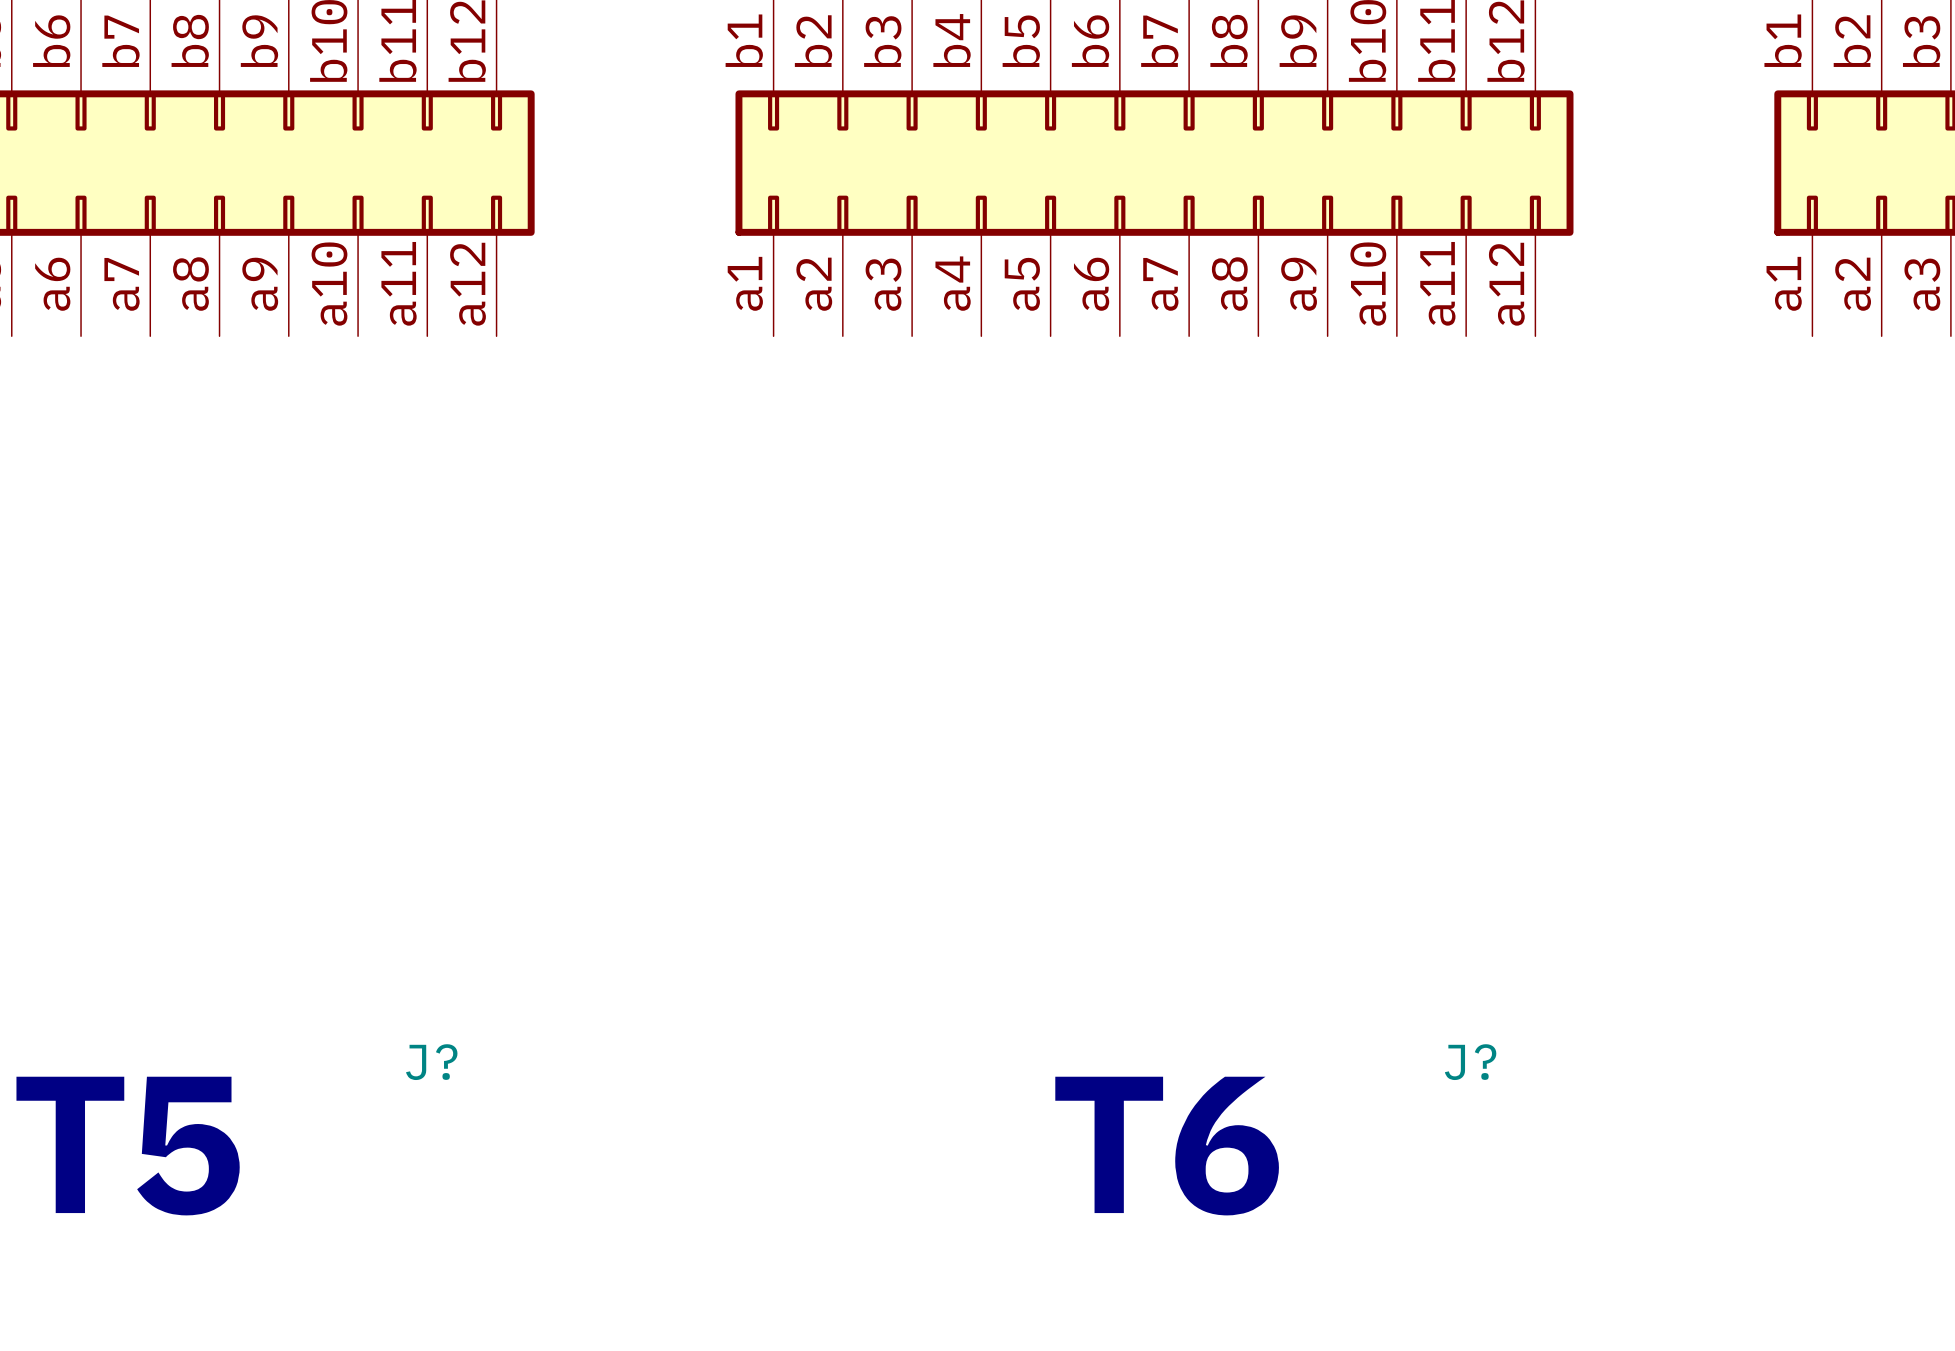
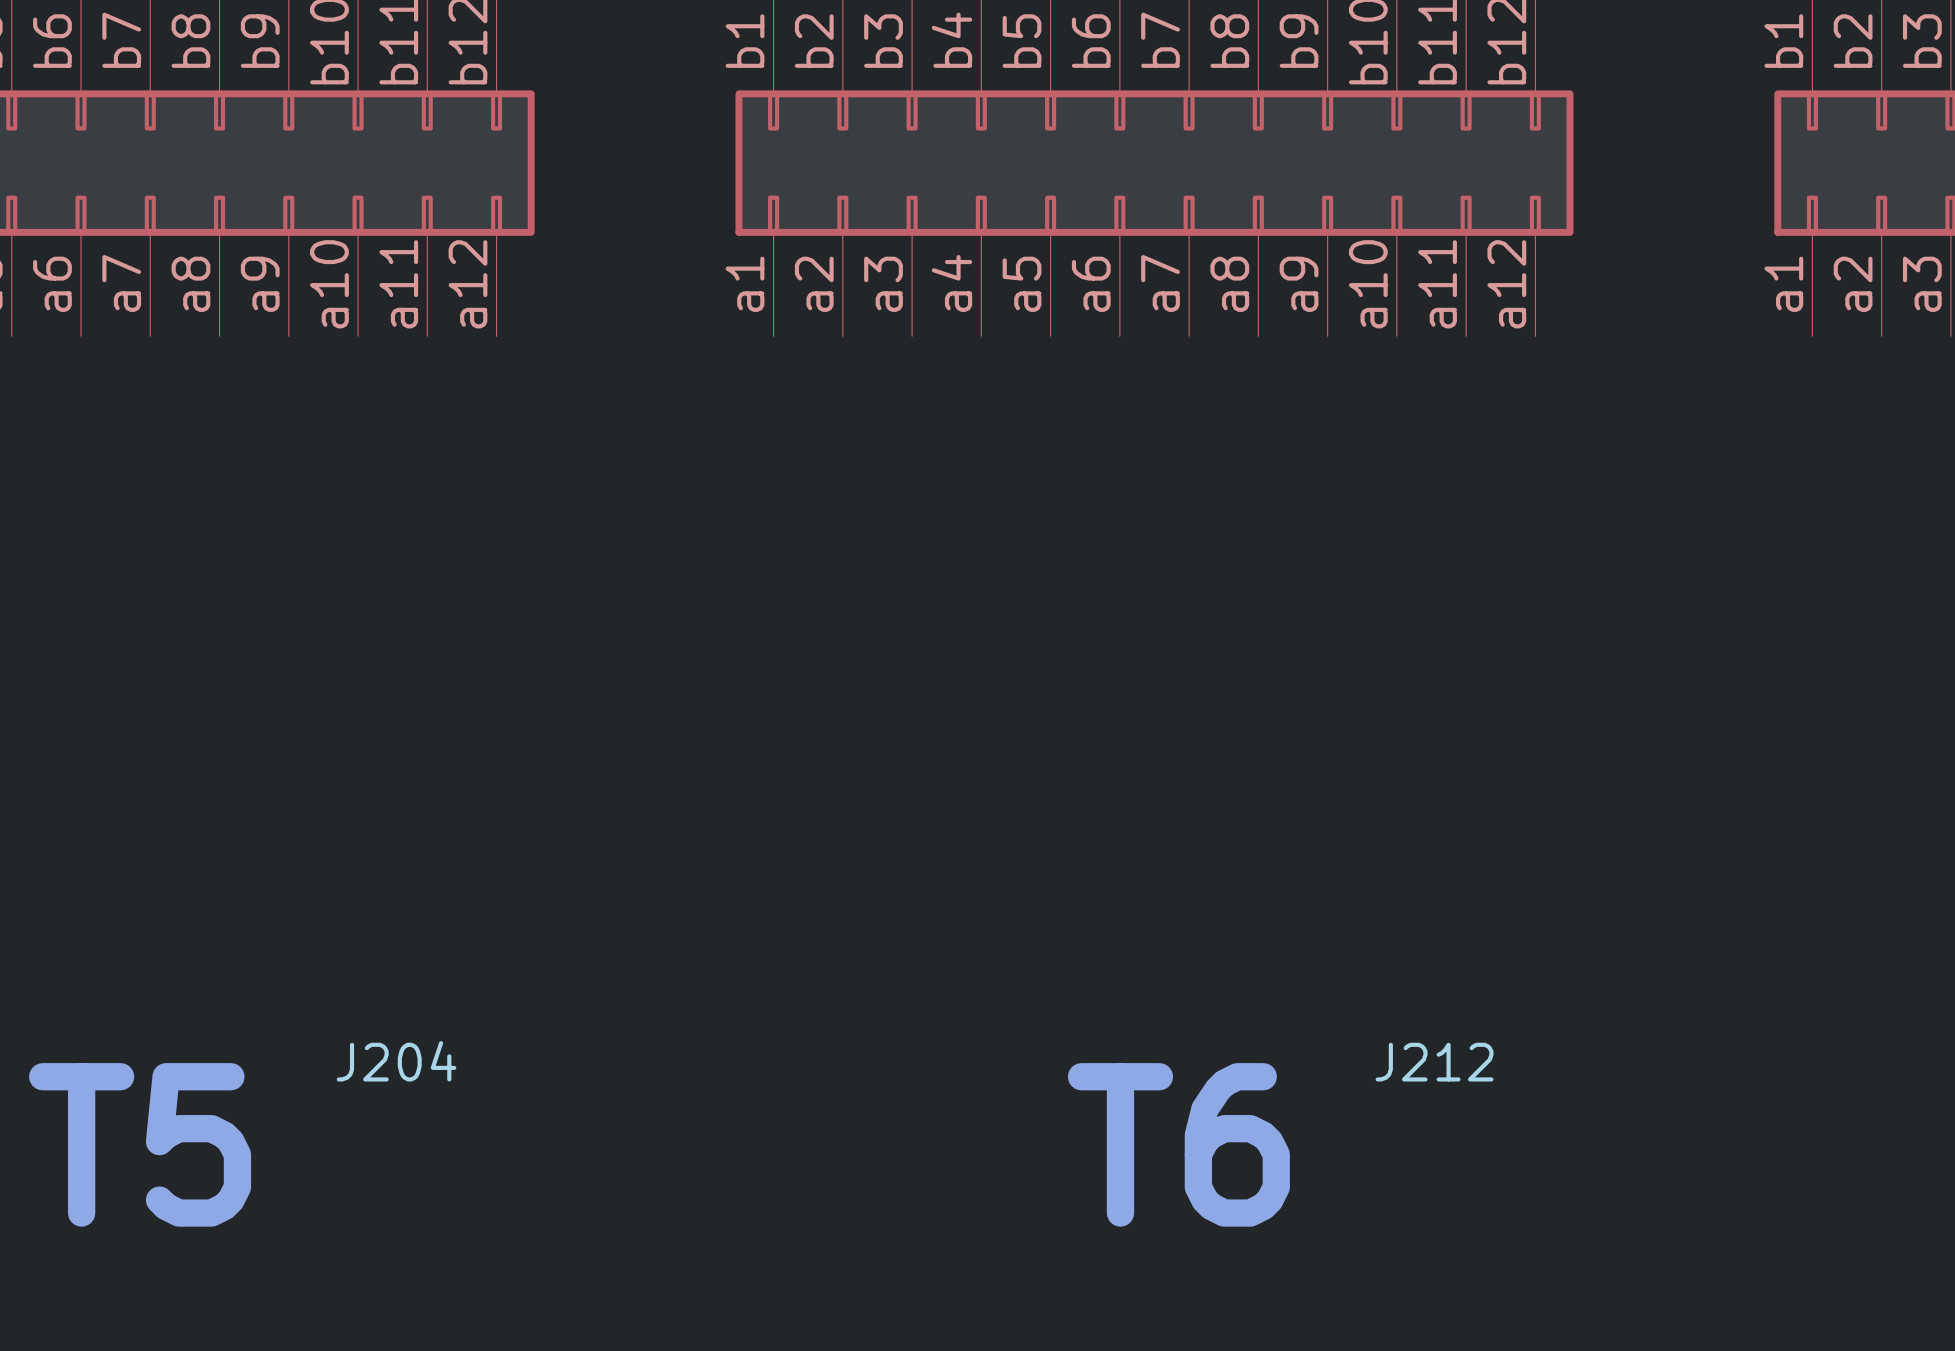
J? name: J? (431, 1062) -> J204 (396, 1061)
J? name: J? (1470, 1062) -> J212 (1434, 1062)

